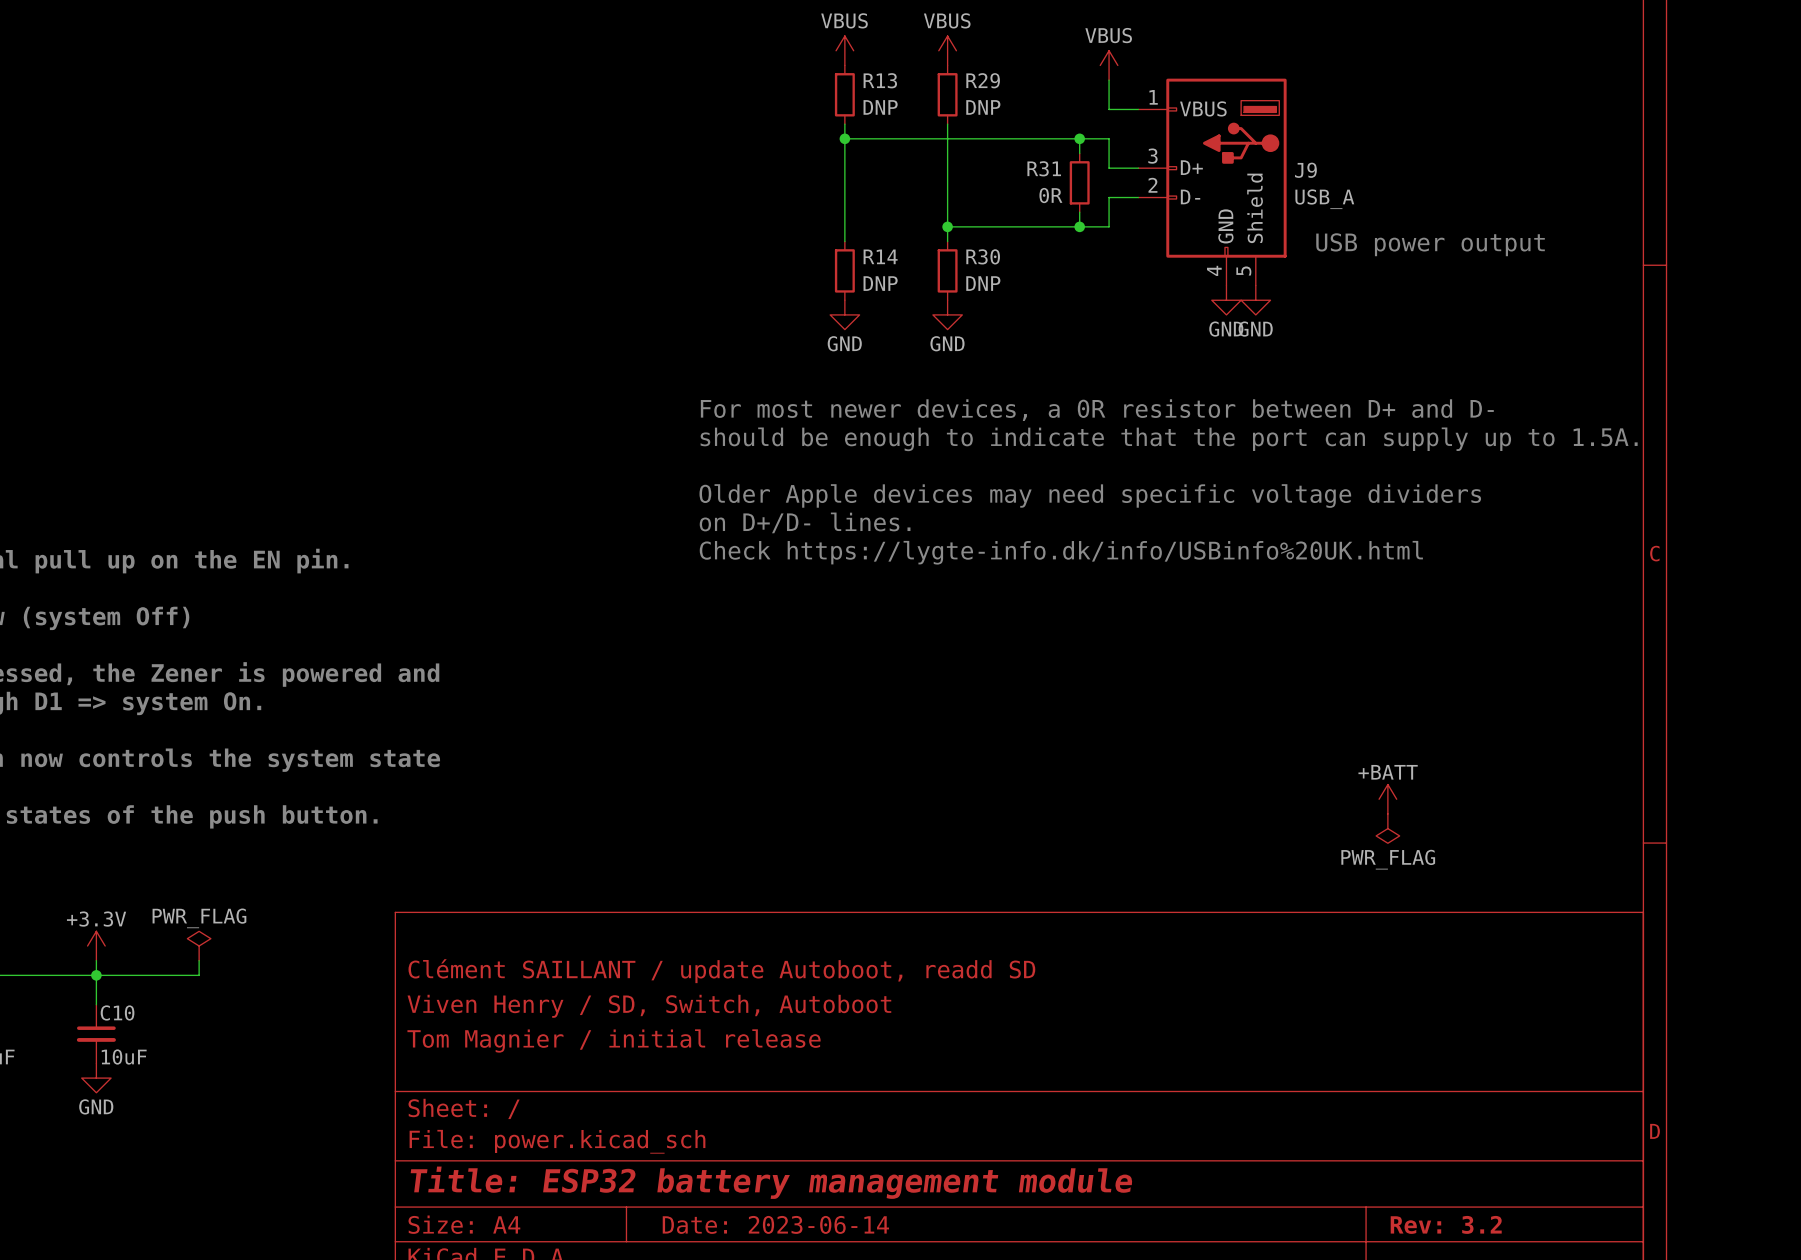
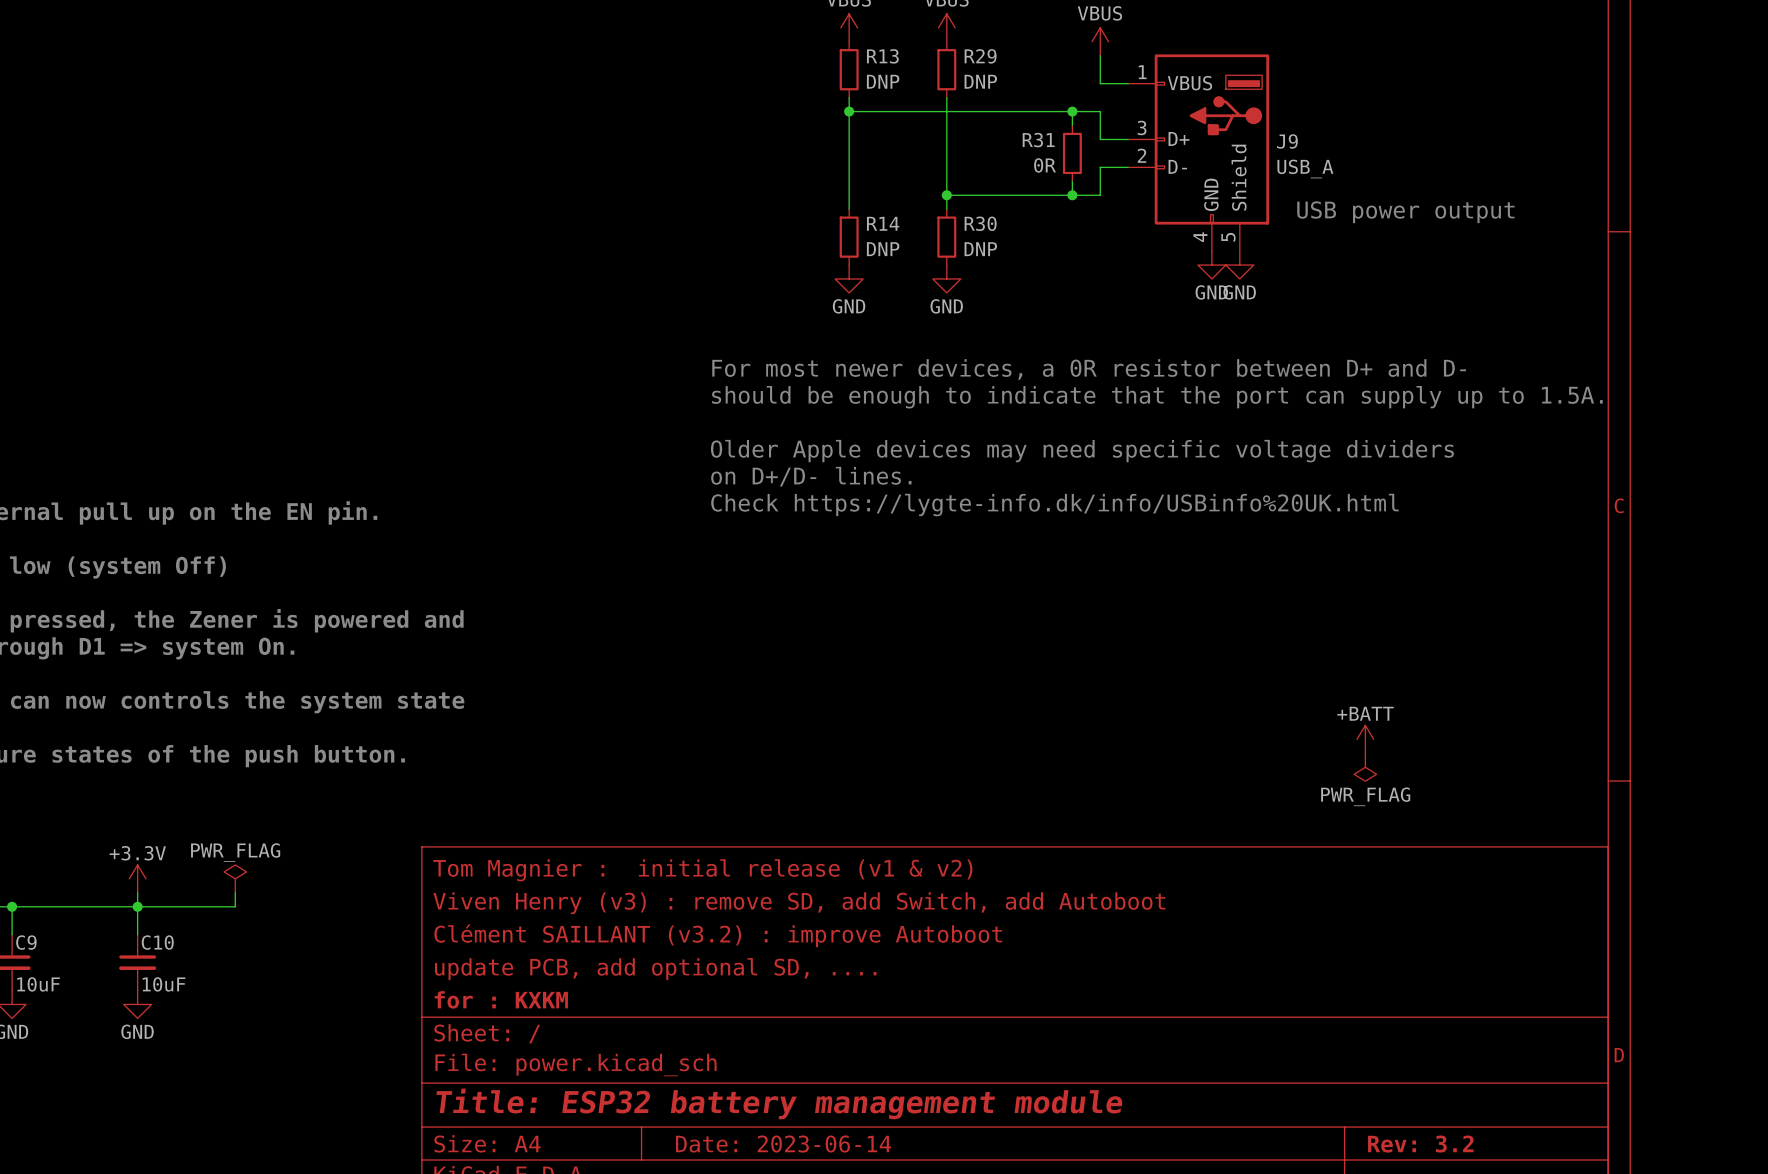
title block: none -> Tom Magnier : initial release (v1 & v2) (702, 870)
title block: Clément SAILLANT / update Autoboot, readd SD (721, 971) -> Viven Henry (v3) : remove SD, add Switch, add Autoboot (799, 903)
title block: Viven Henry / SD, Switch, Autoboot (649, 1006) -> Clément SAILLANT (v3.2) : improve Autoboot (718, 935)
title block: Tom Magnier / initial release (614, 1040) -> update PCB, add optional SD, .... (655, 969)
title block: none -> for : KXKM (501, 999)

